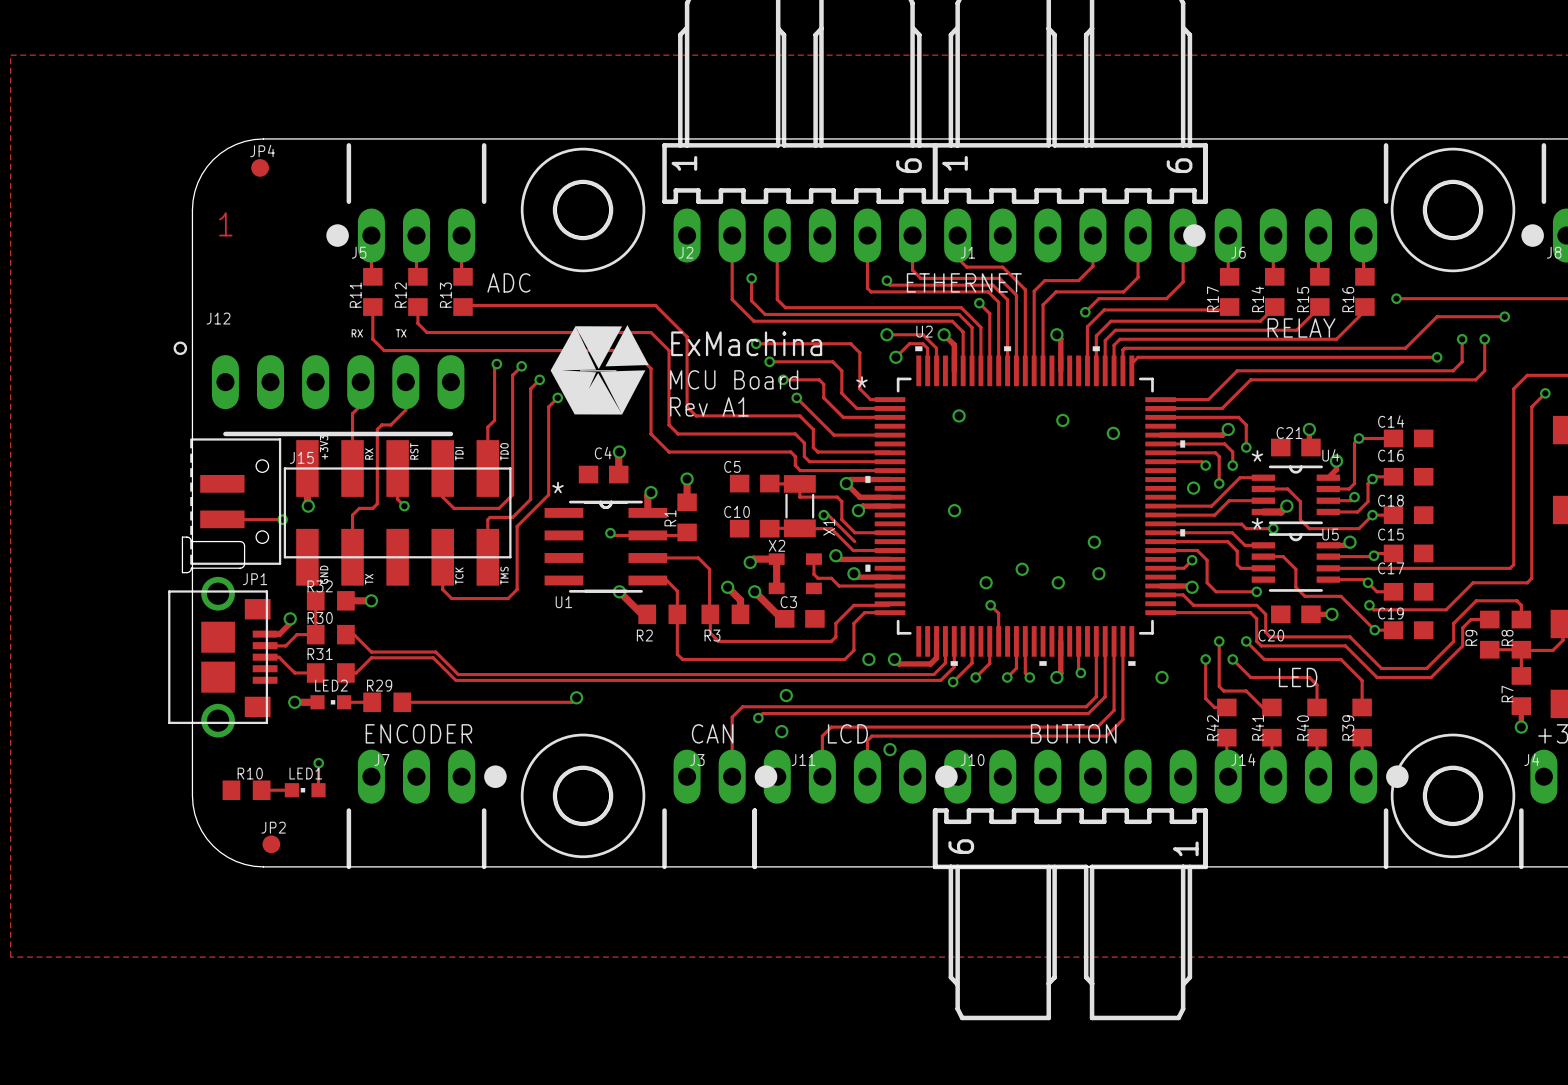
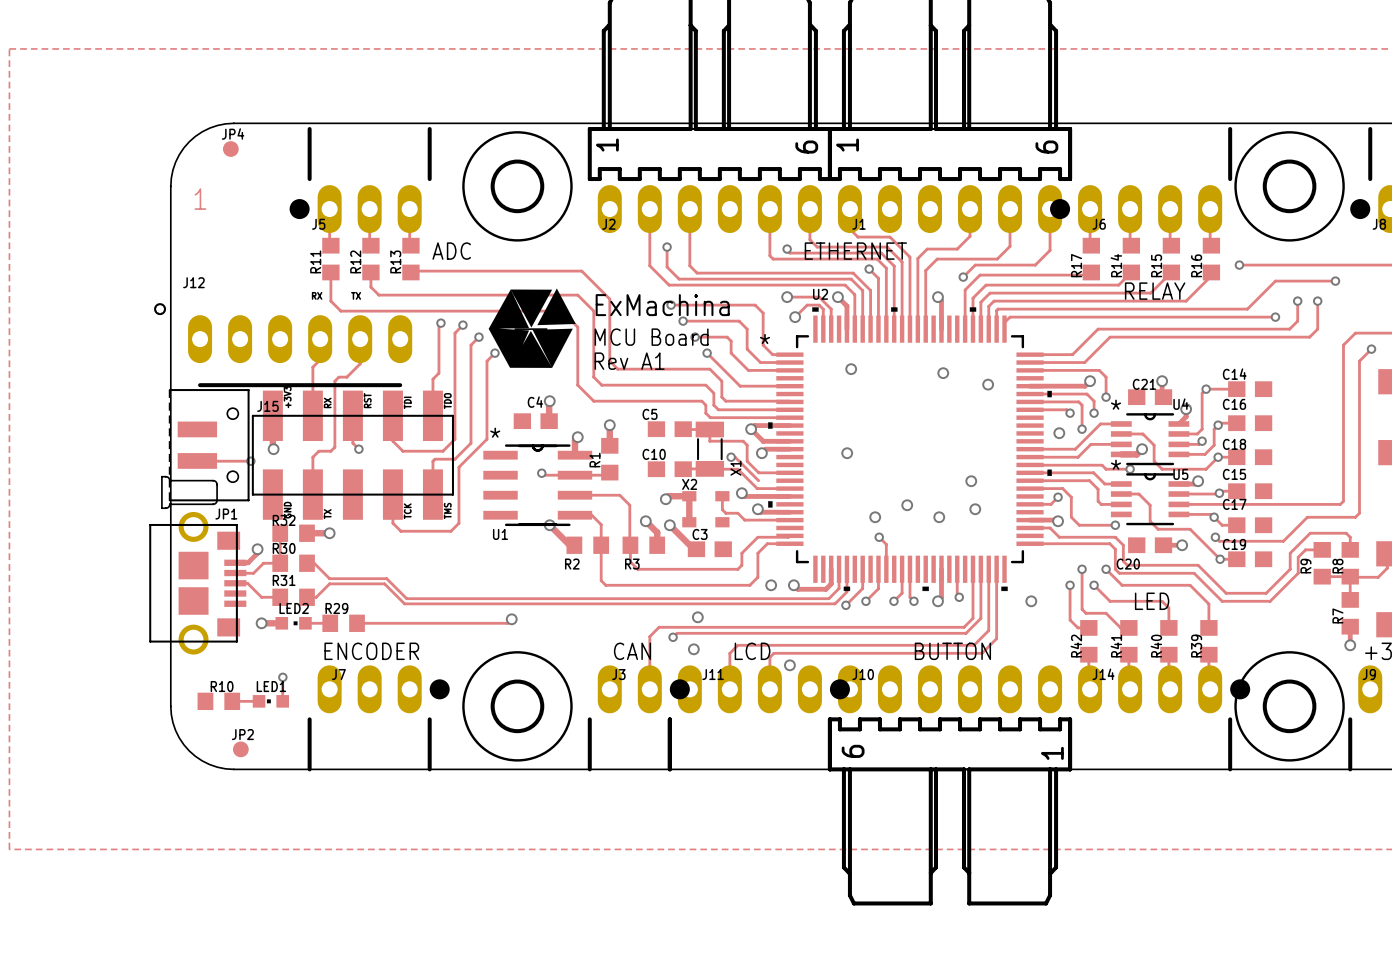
J4 name: J4 (1531, 759) -> J9 (1369, 674)

